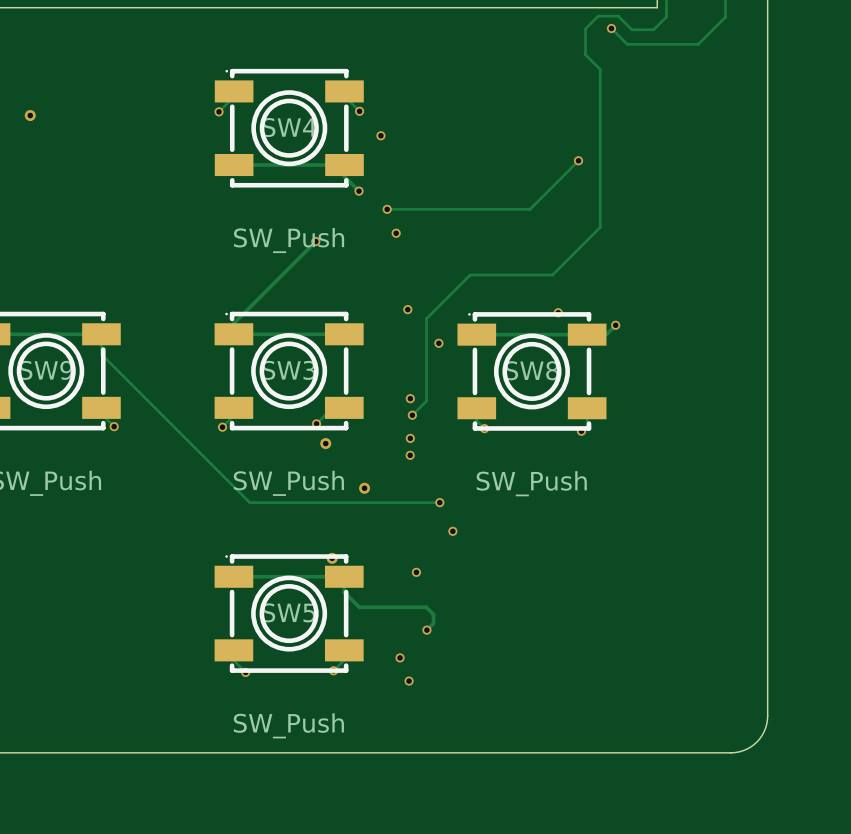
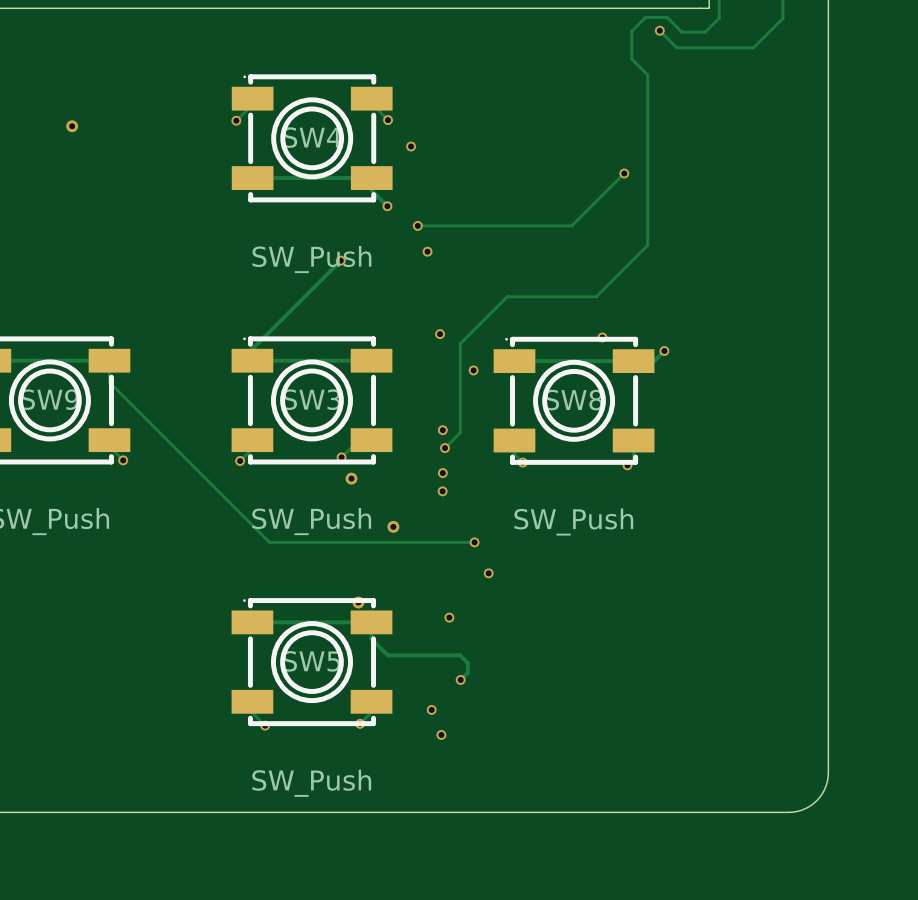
via position: (30, 115) -> (72, 126)

